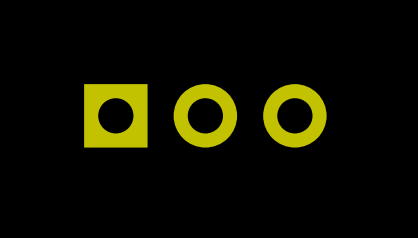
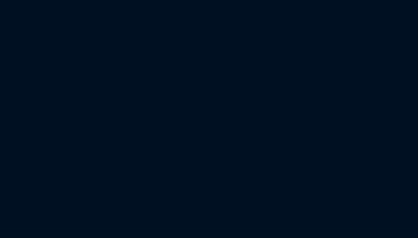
part: (205, 115) -> none

